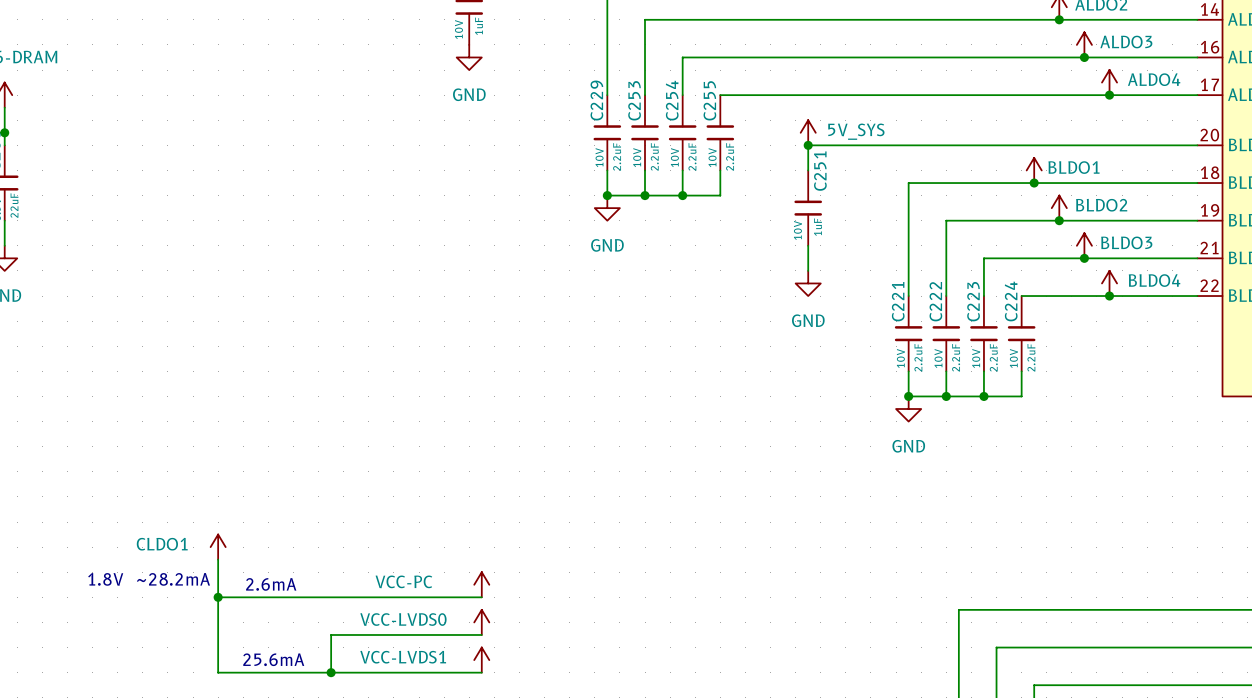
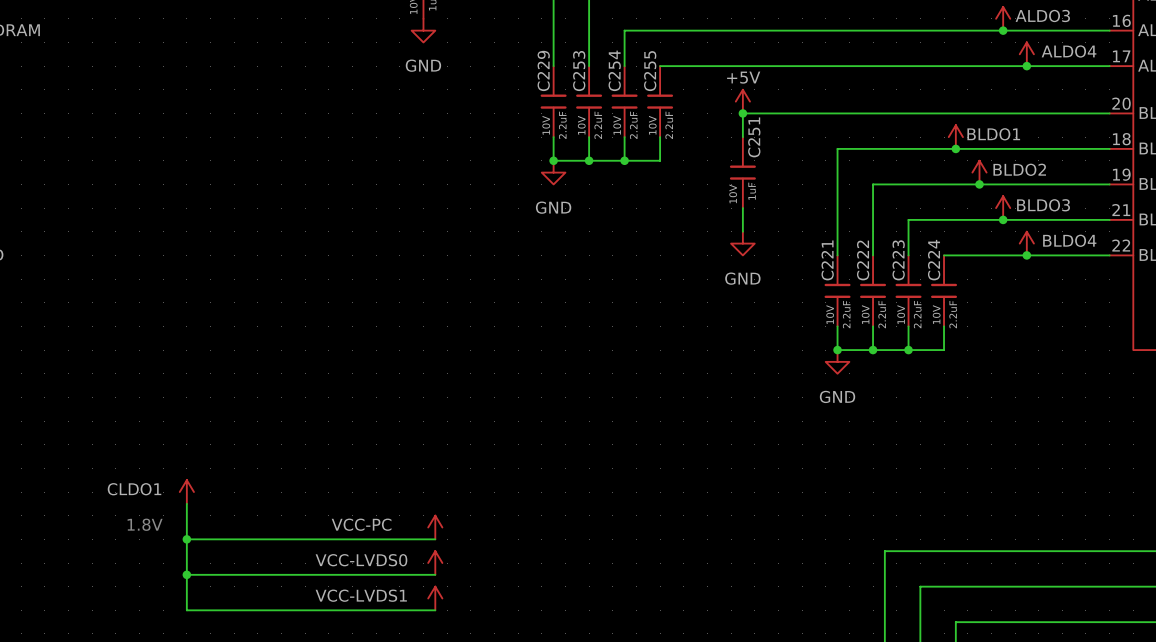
power symbol: 5V_SYS (808, 132) -> +5V (742, 101)
text: 1.8V (105, 579) -> none
text: ~28.2mA (173, 579) -> 1.8V (145, 524)
text: 2.6mA (271, 584) -> none
junction: none -> (186, 574)
wire: (331, 634) (331, 672) -> (293, 574) (186, 574)
text: 25.6mA (273, 659) -> none
junction: (331, 672) -> none

